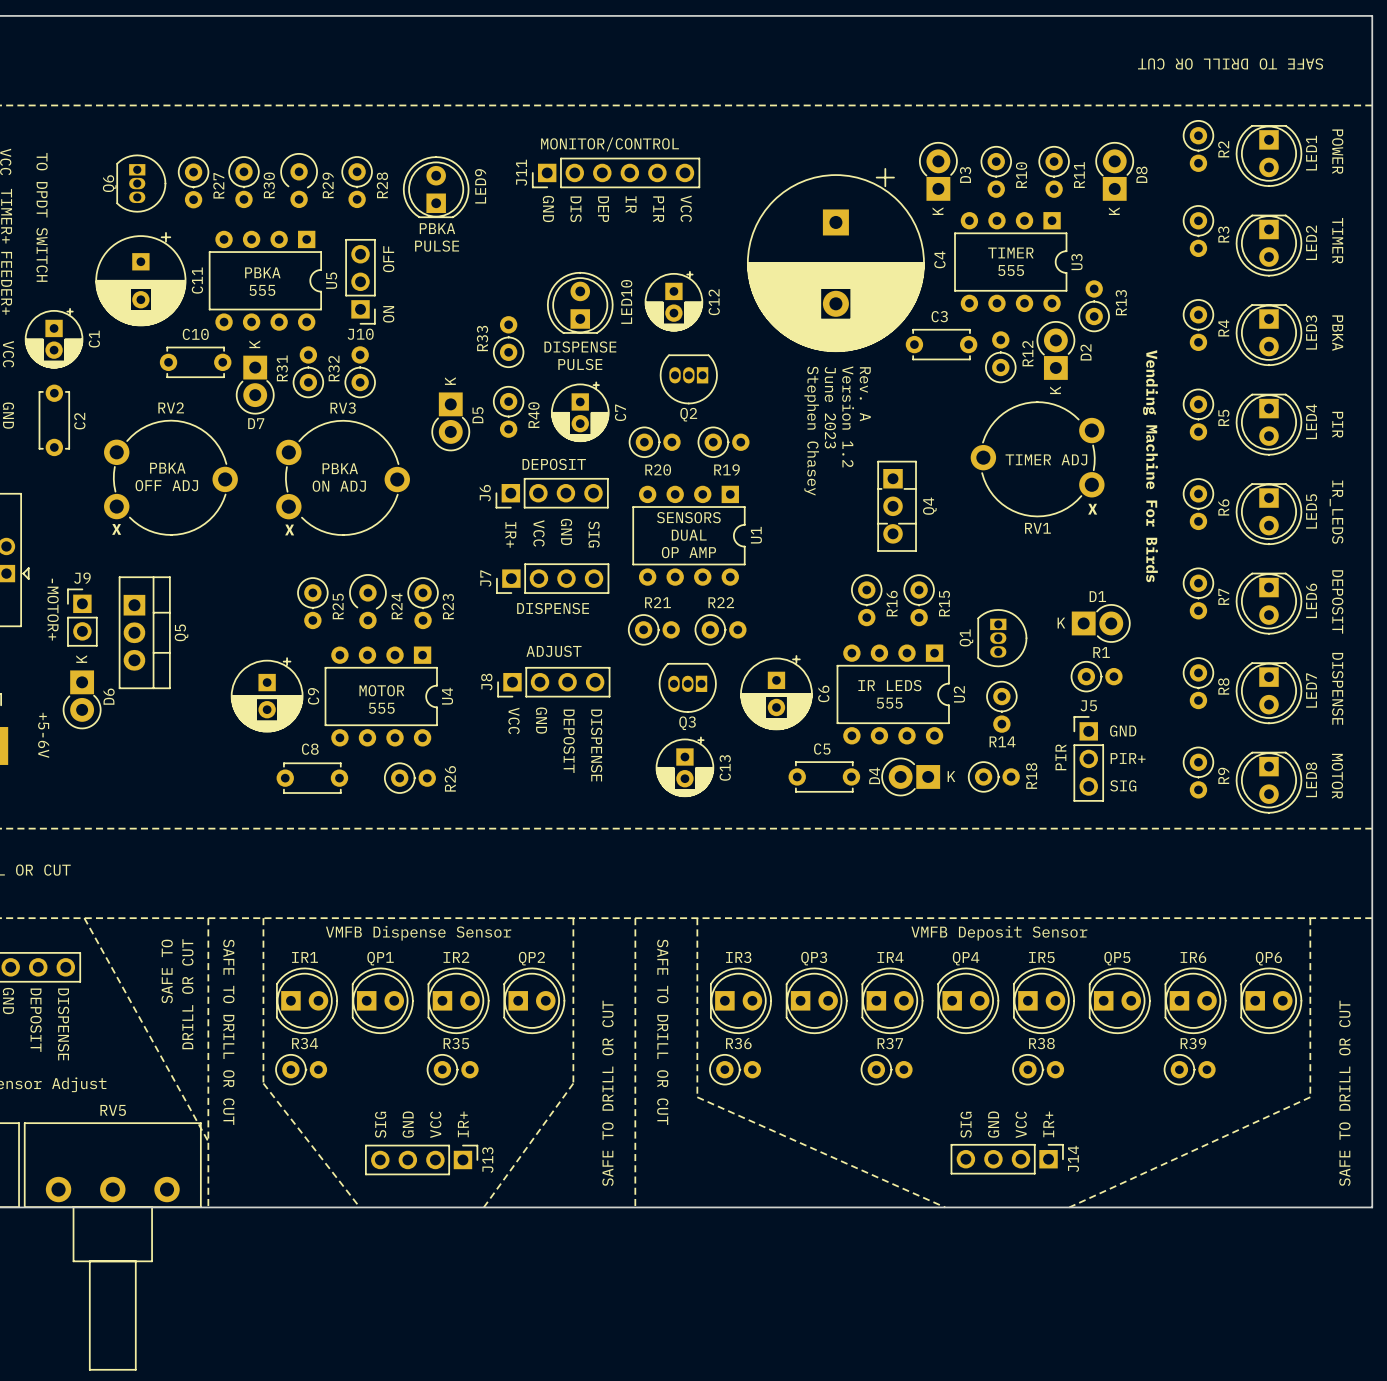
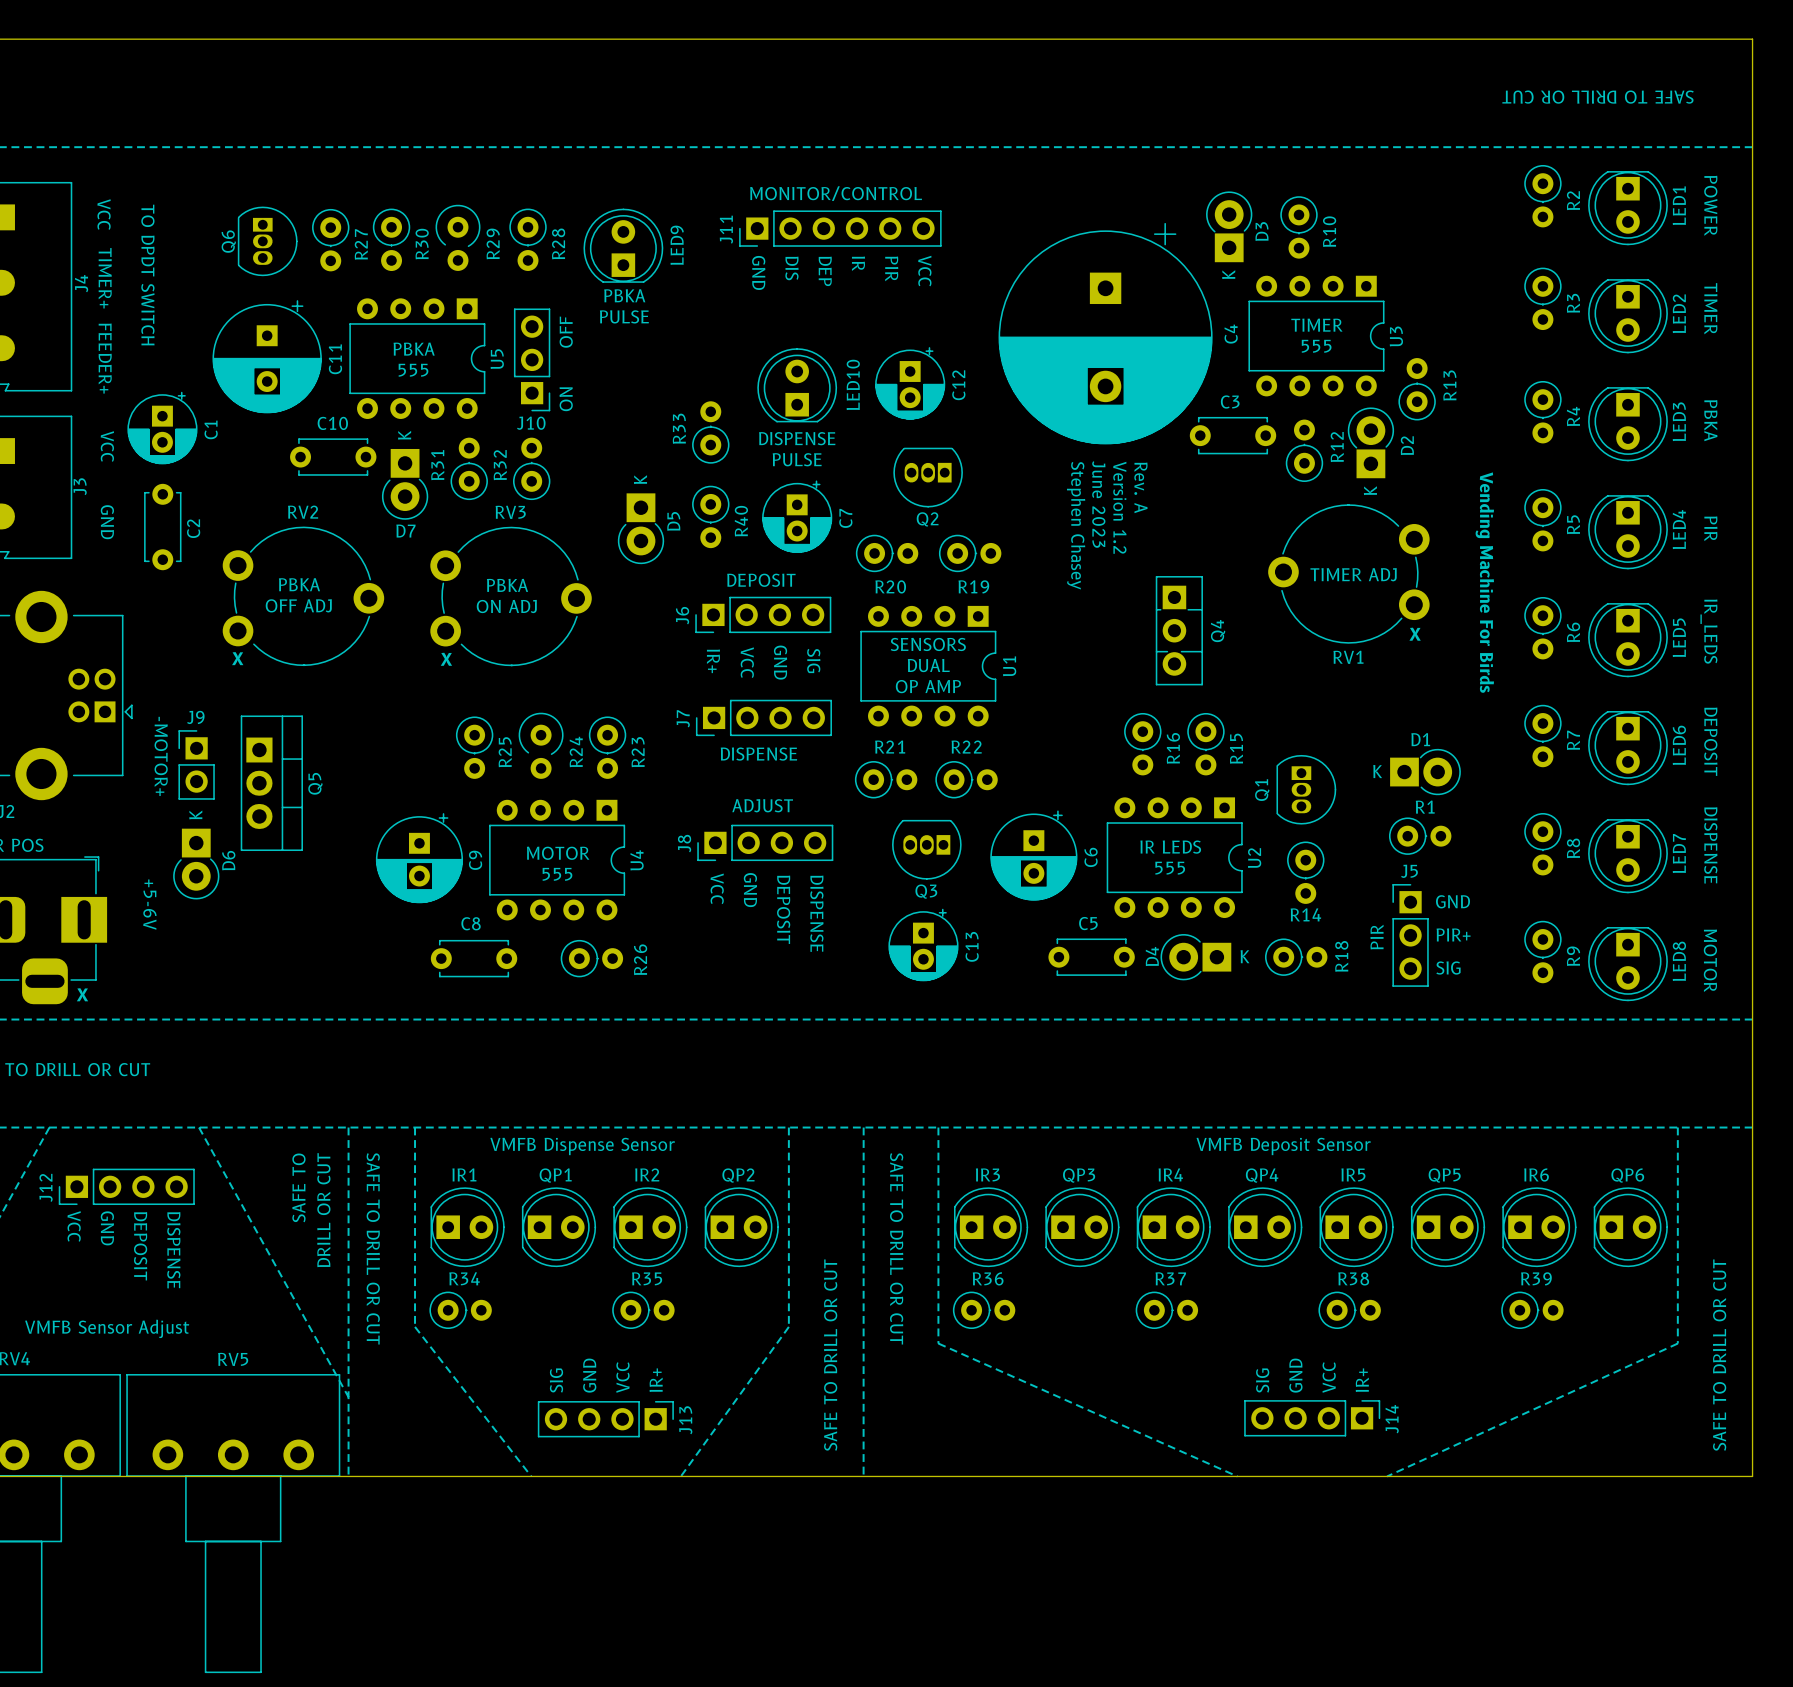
R11: (1054, 171) -> none
D8: (1114, 171) -> none

